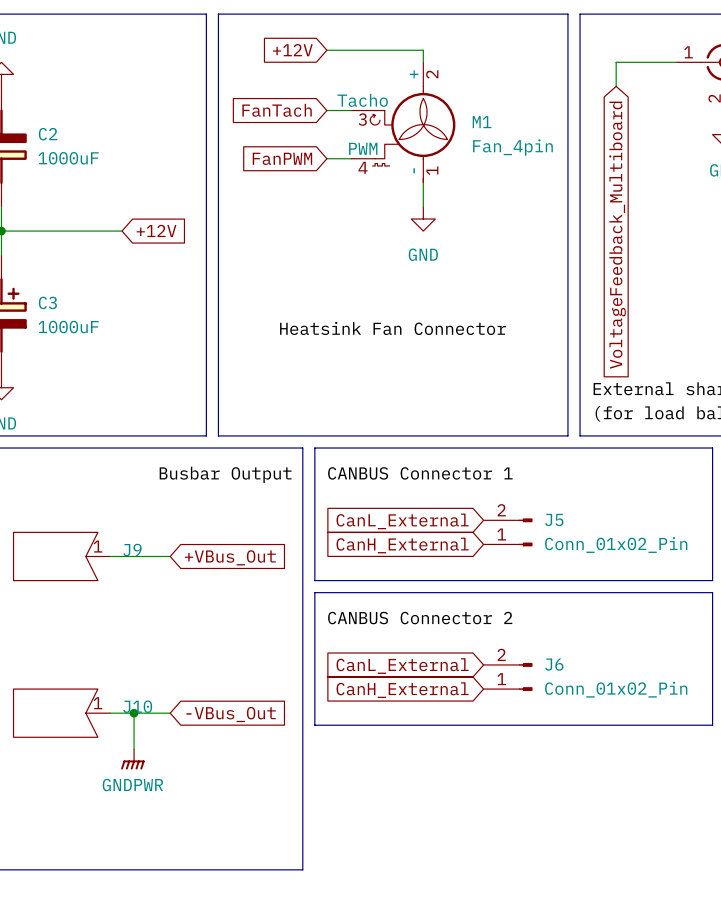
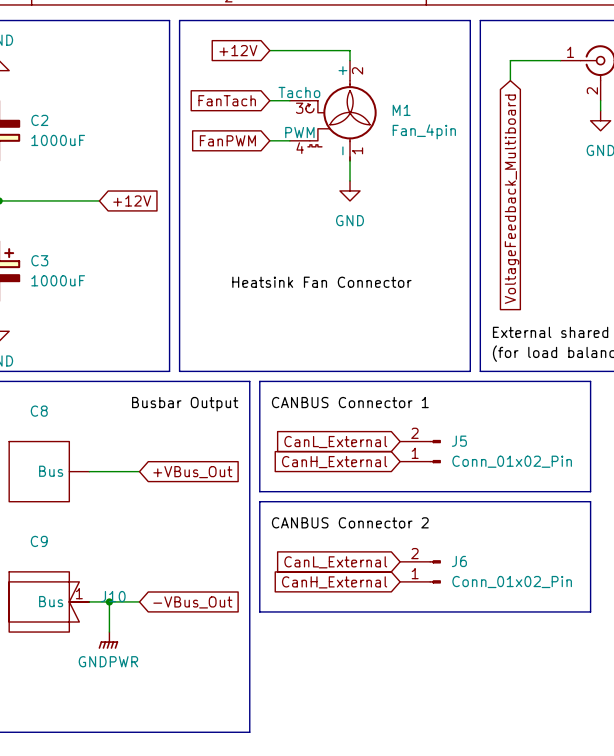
J9: (61, 556) -> none
C8: none -> (49, 471)
C9: none -> (49, 601)

